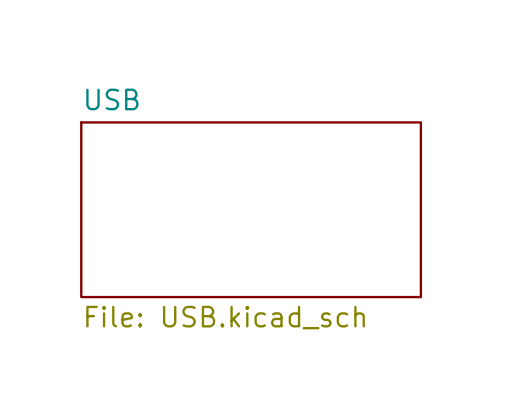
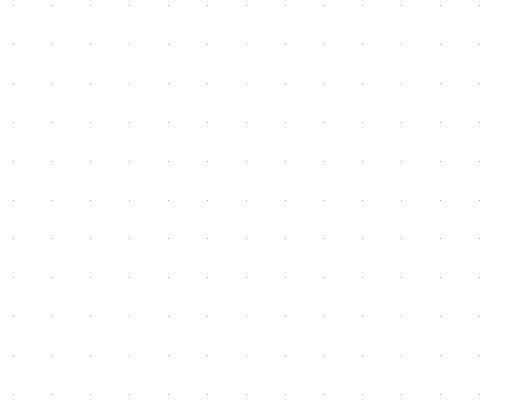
sheet USB: File: USB.kicad_sch (251, 209) -> none

